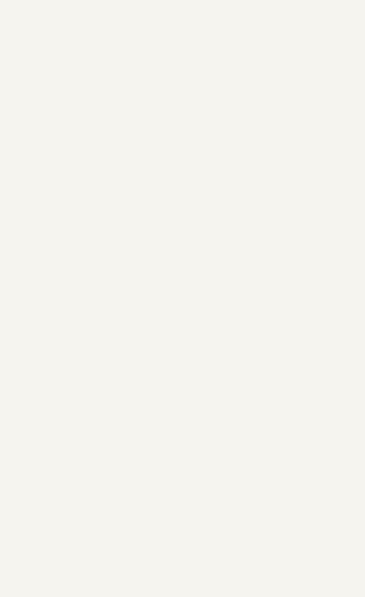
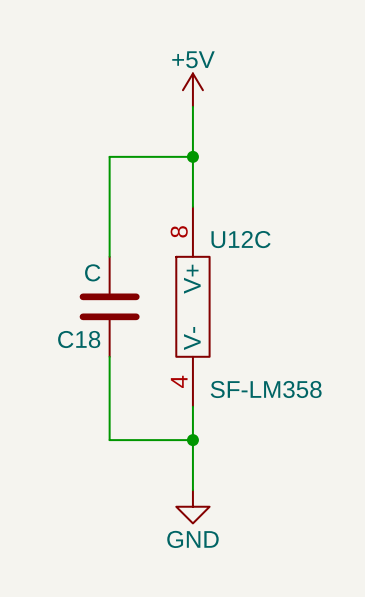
power symbol: none -> +5V (192, 90)
wire: none -> (192, 106) (192, 206)
wire: none -> (192, 156) (109, 156) (109, 256)
junction: none -> (192, 156)
C18: none -> C (109, 306)
U12C: none -> SF-LM358 (192, 306)
wire: none -> (109, 356) (109, 440) (192, 440)
wire: none -> (192, 406) (192, 490)
junction: none -> (192, 440)
power symbol: none -> GND (192, 506)

